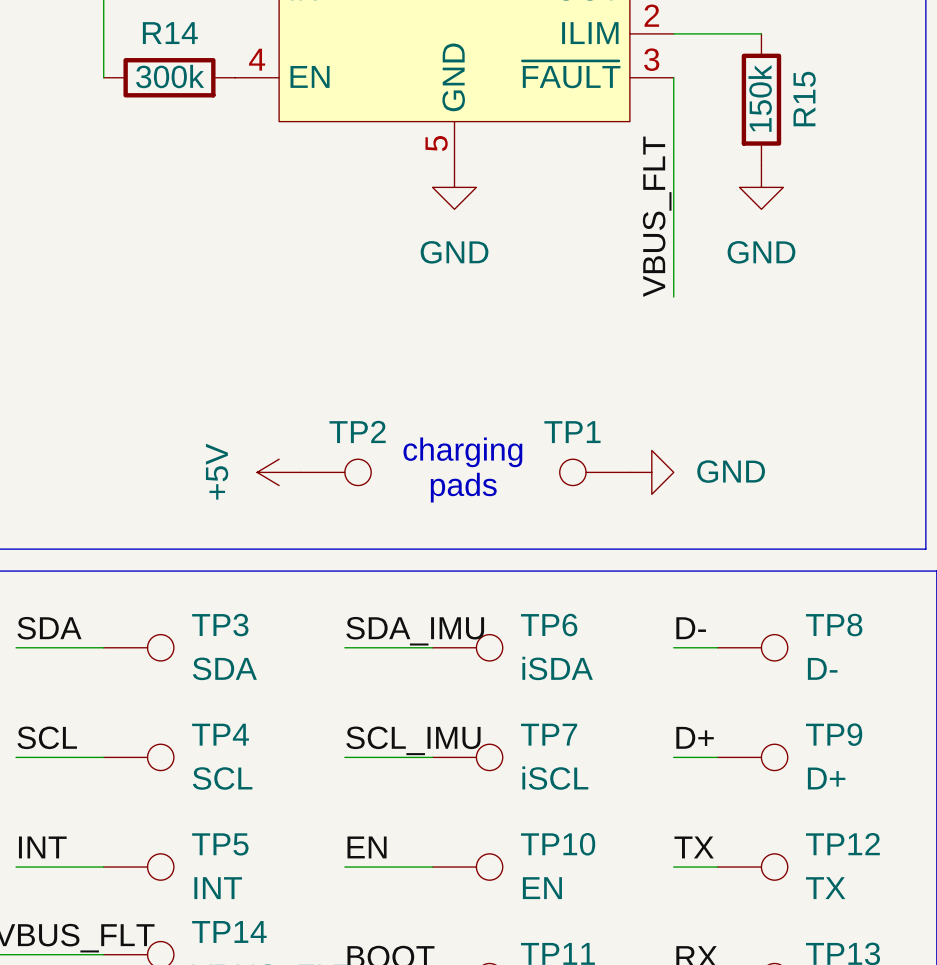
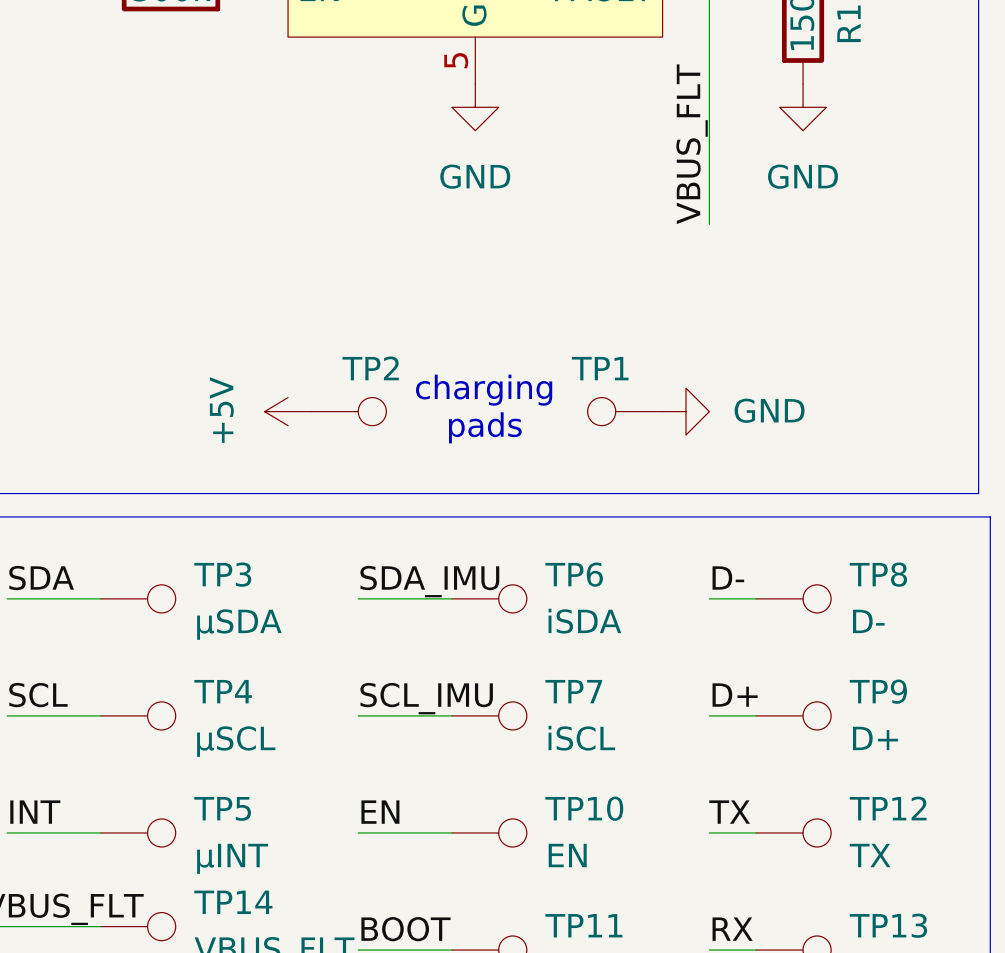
TP3 value: SDA (224, 668) -> µSDA (239, 624)
TP4 value: SCL (222, 778) -> µSCL (236, 741)
TP5 value: INT (218, 888) -> µINT (232, 858)

